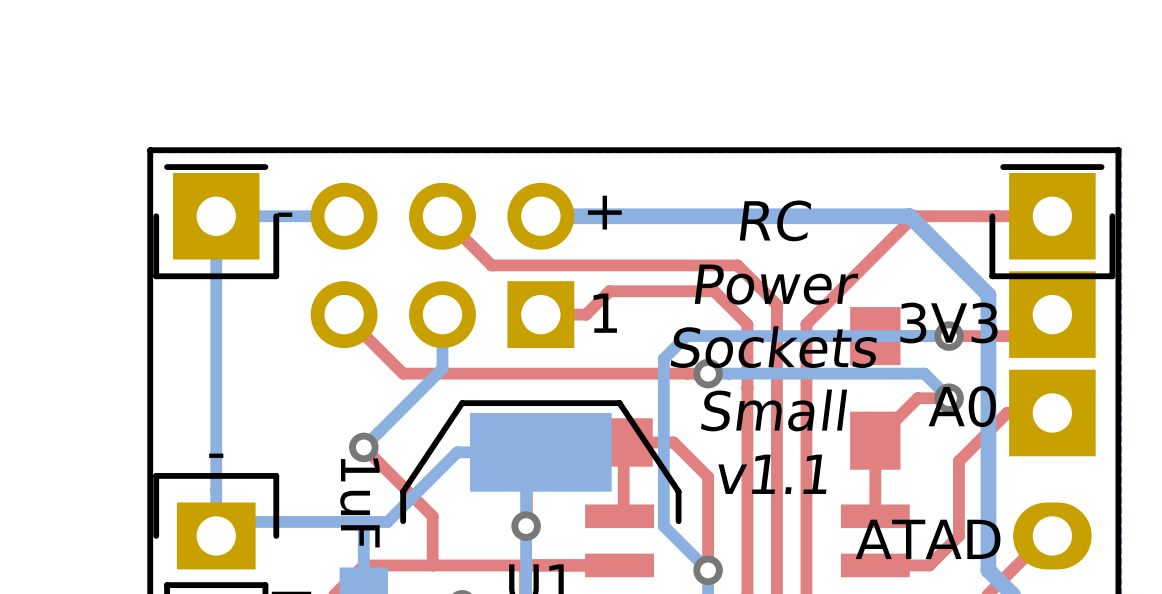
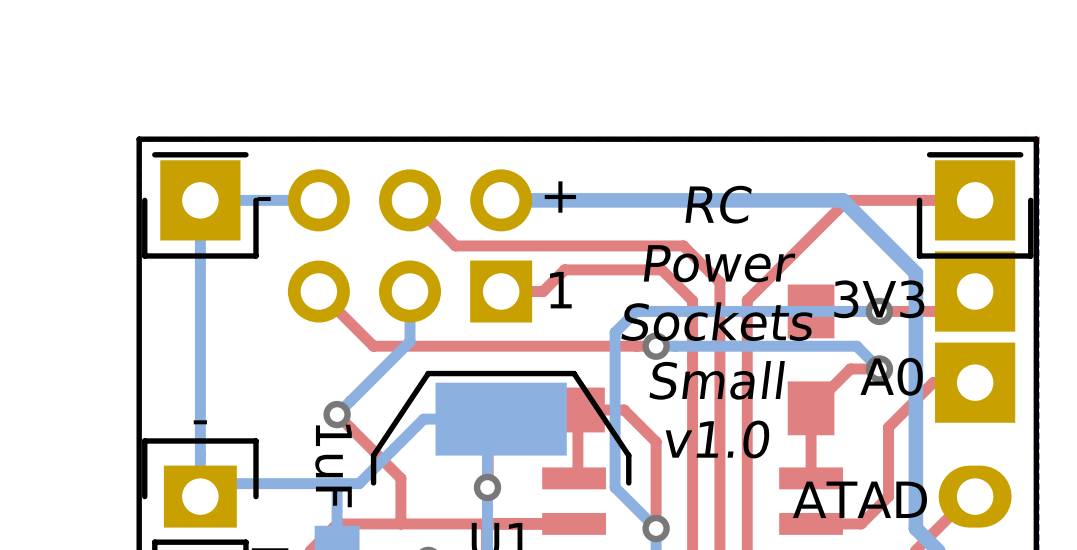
text: v1.1 (772, 474) -> v1.0 (717, 439)

